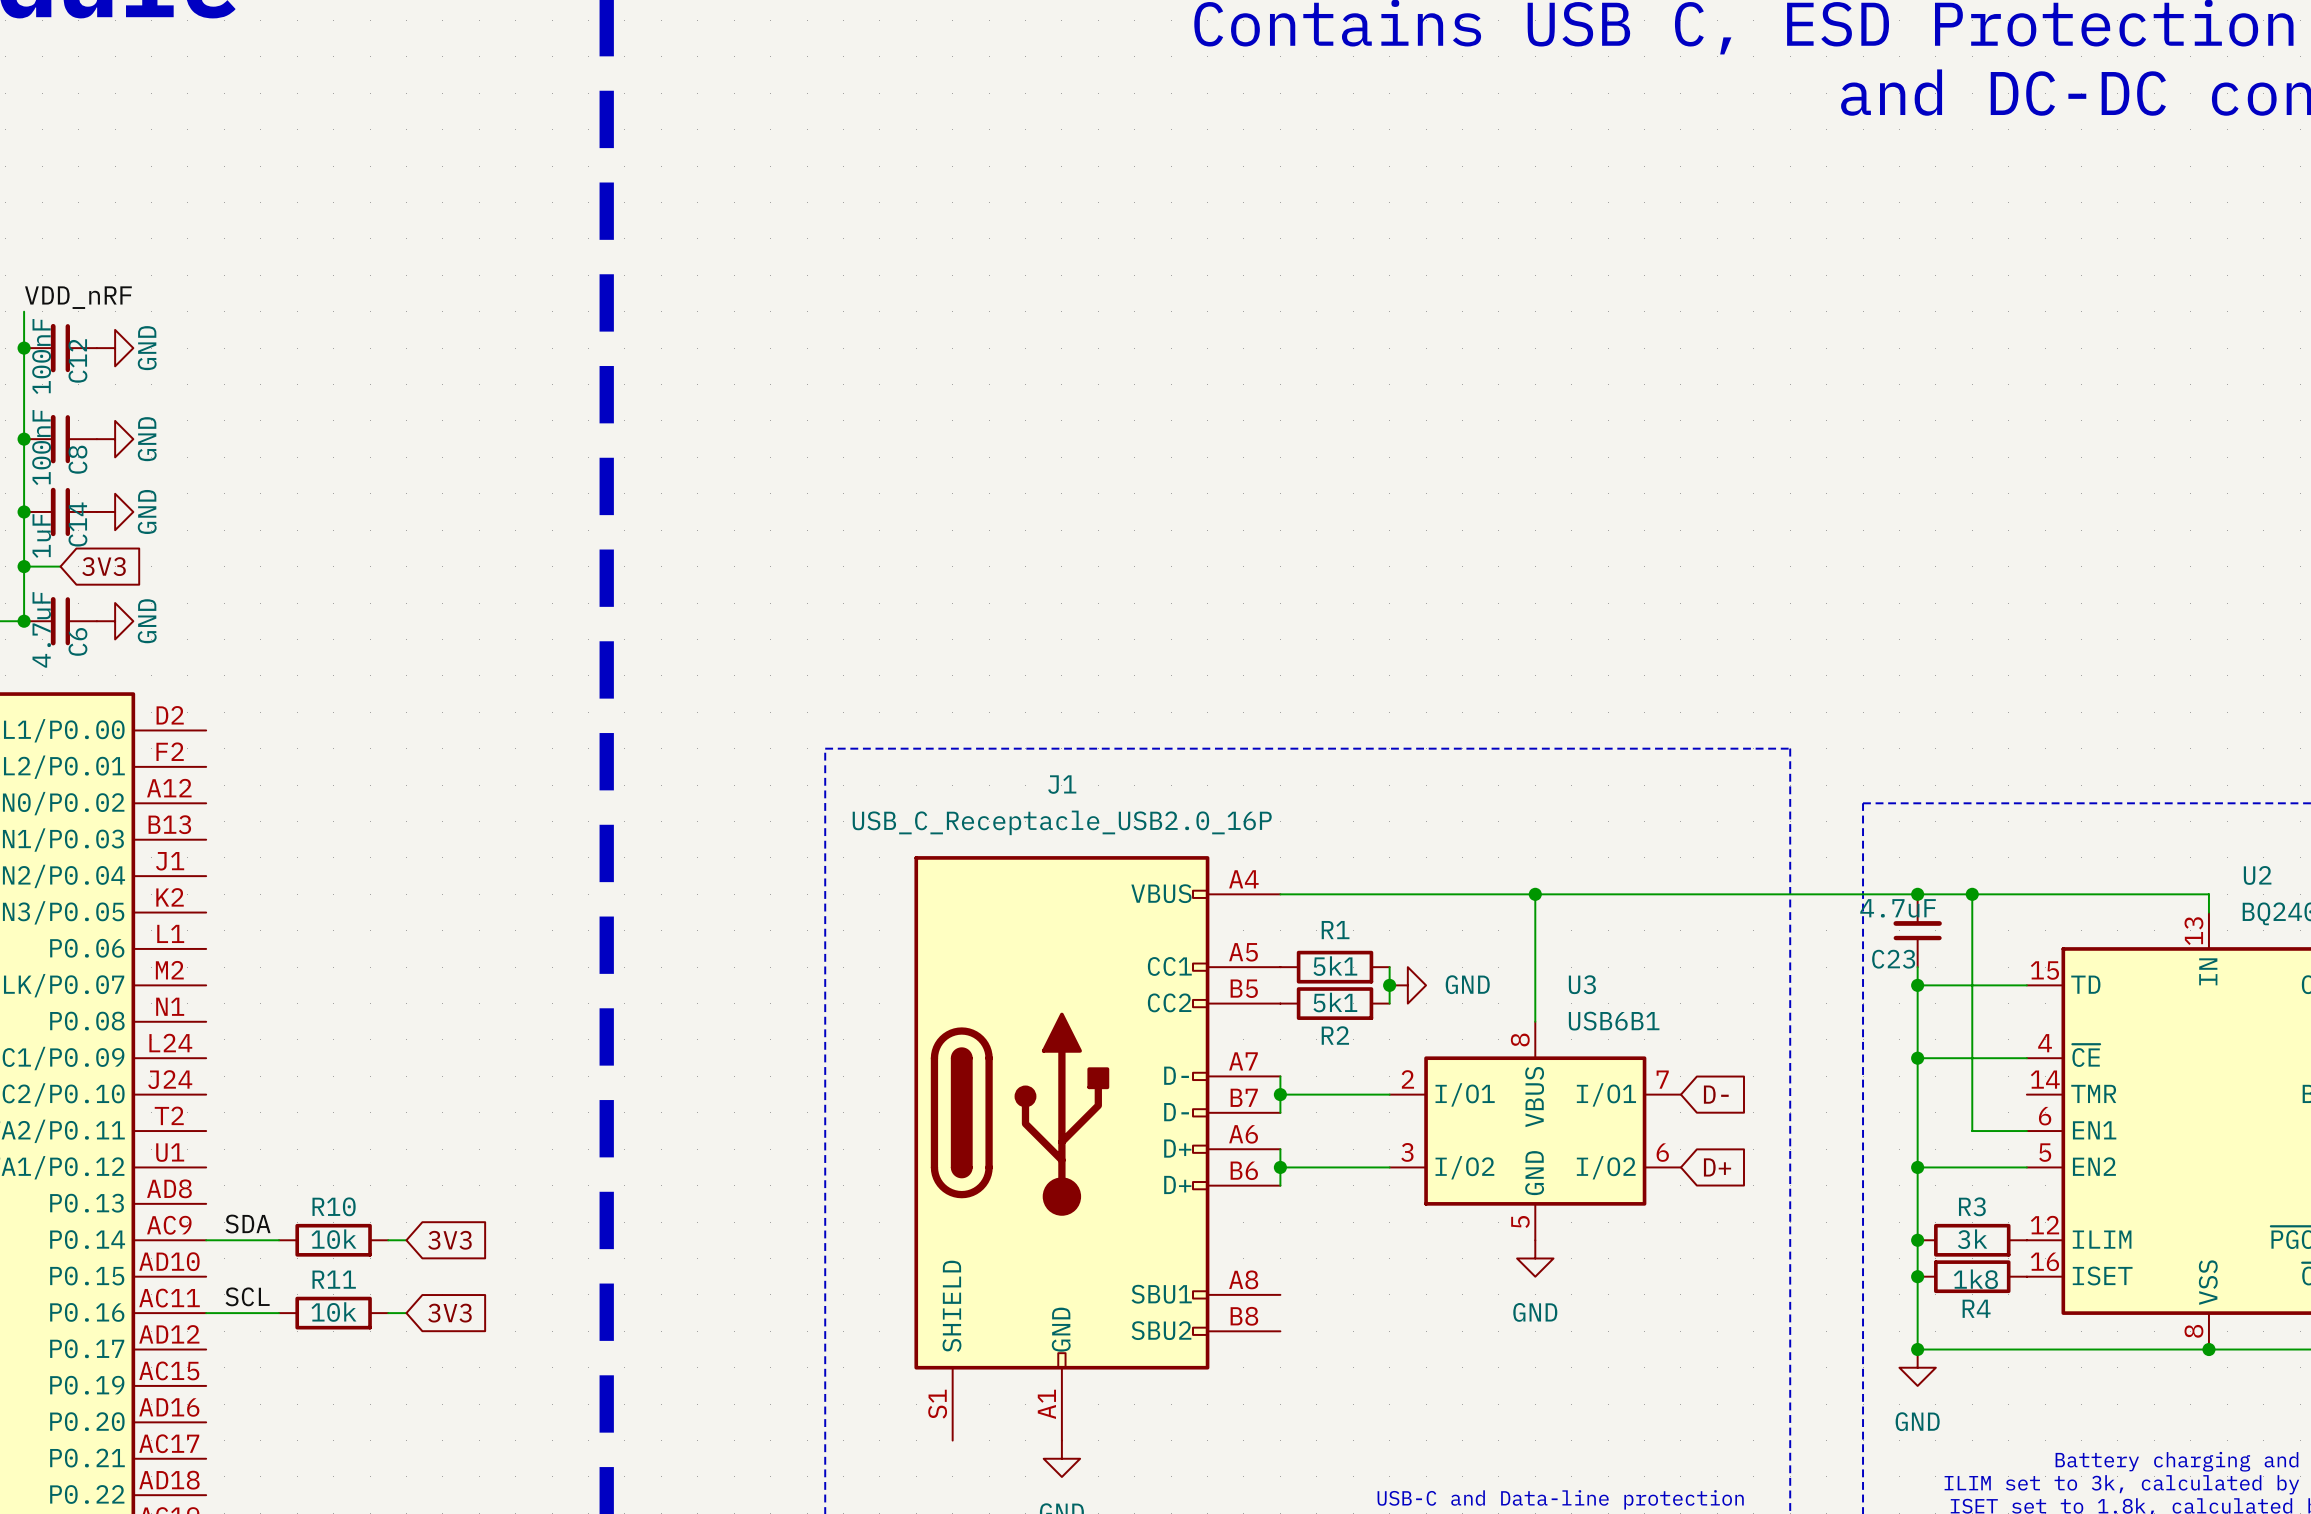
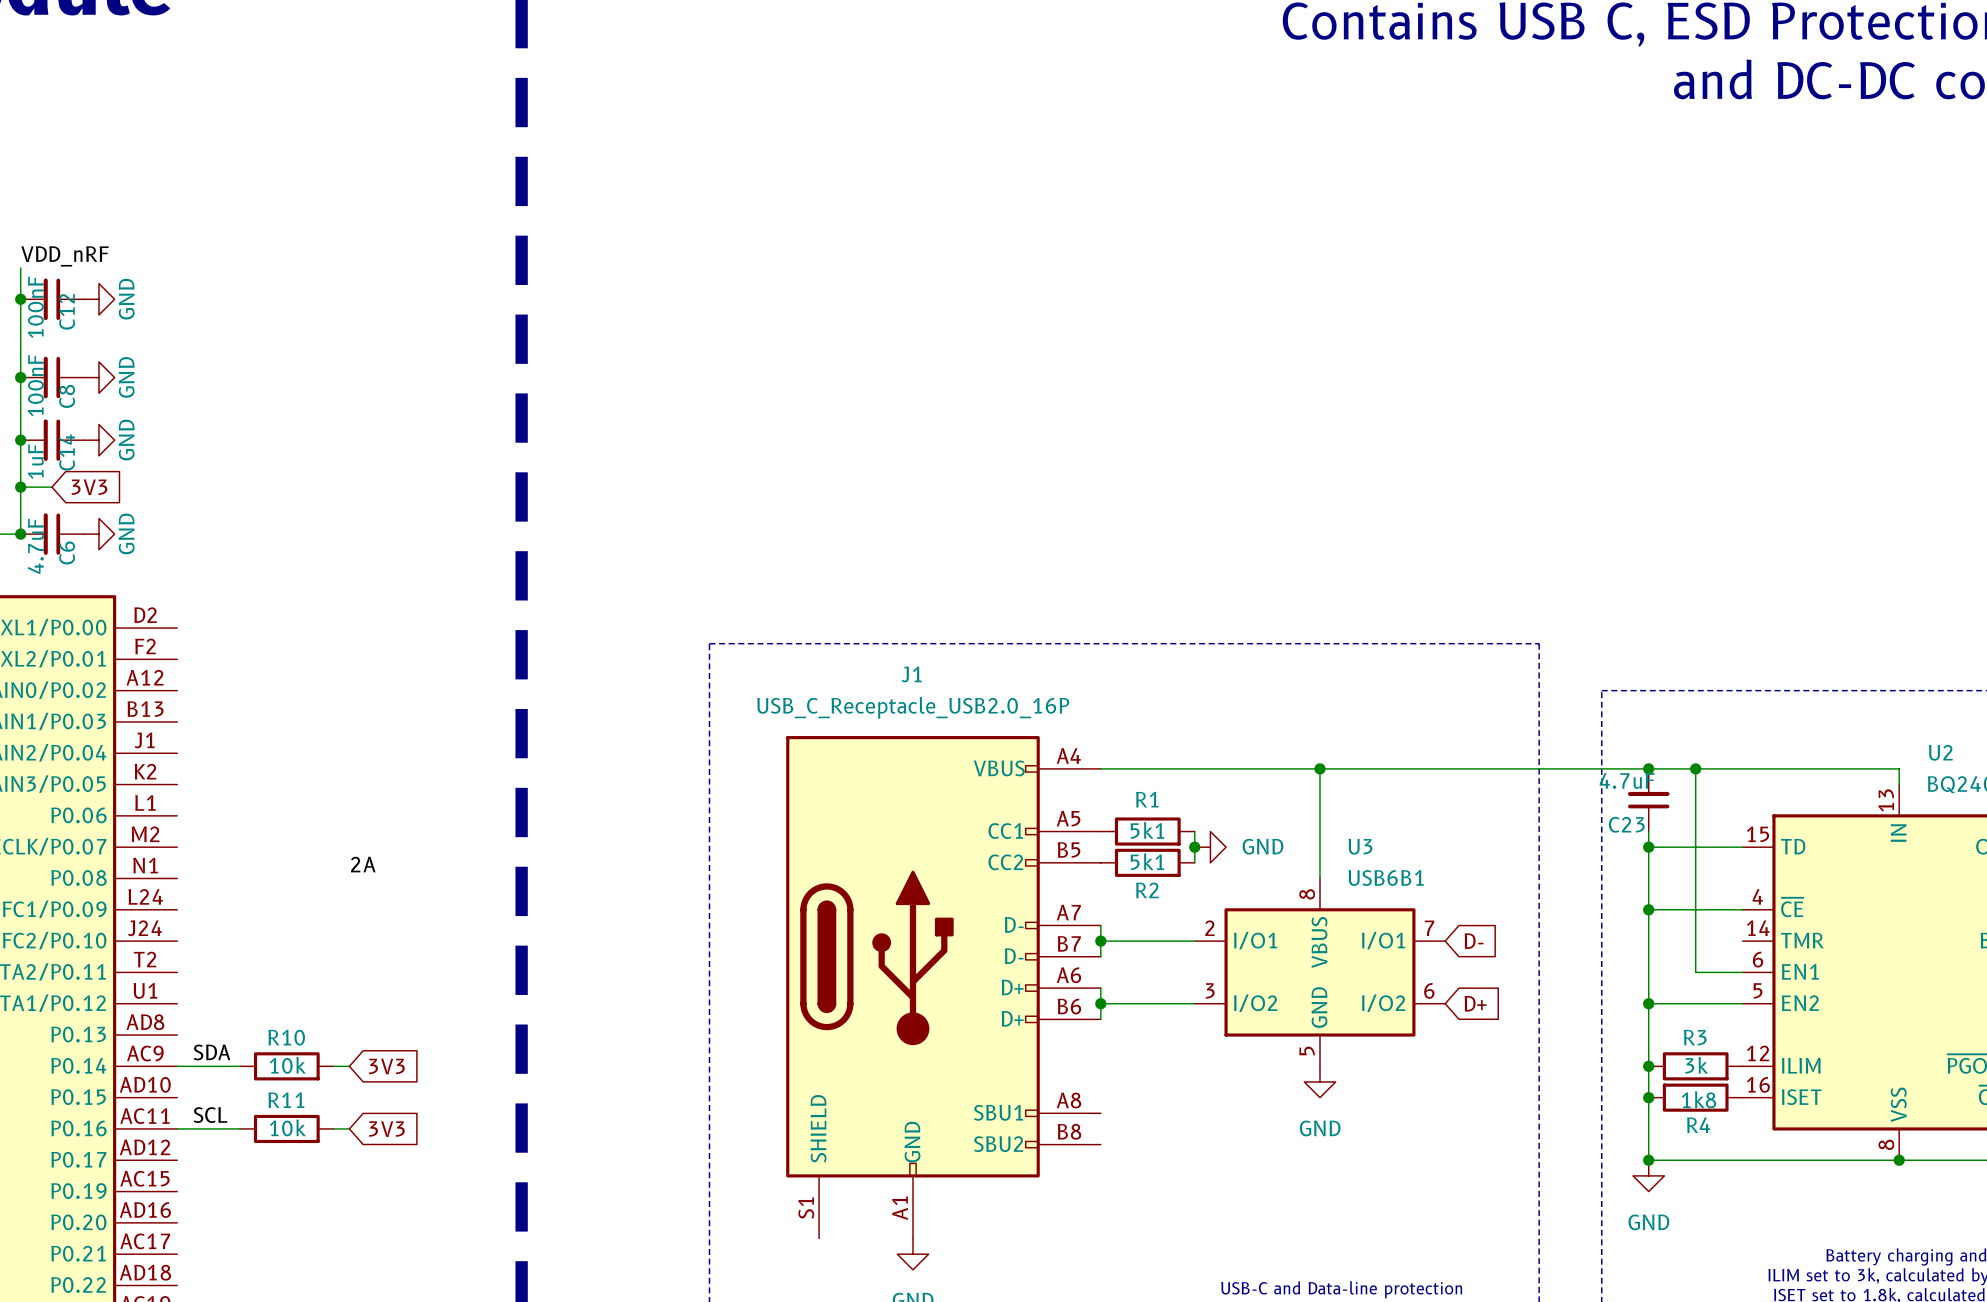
label: none -> 2A (363, 864)

